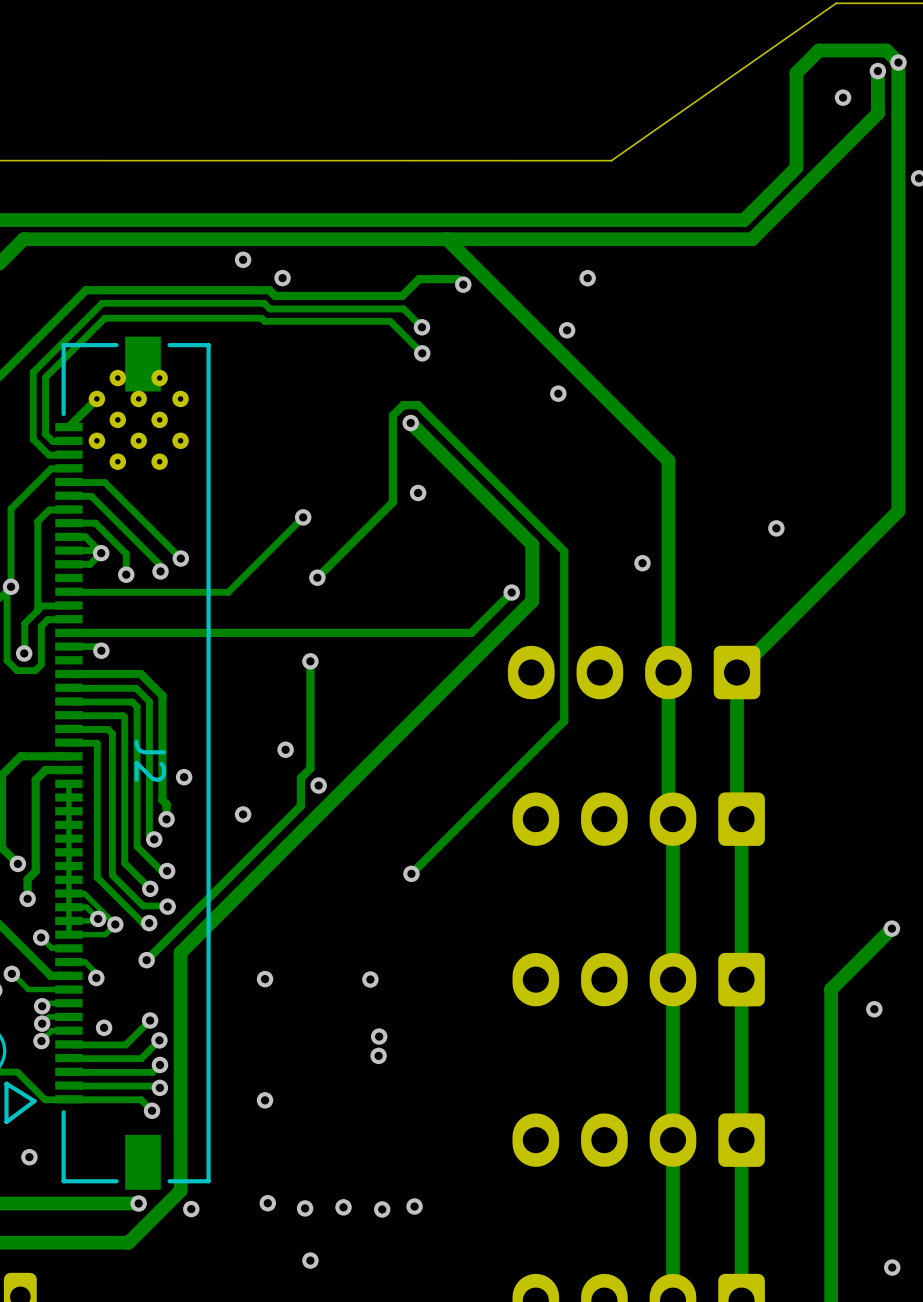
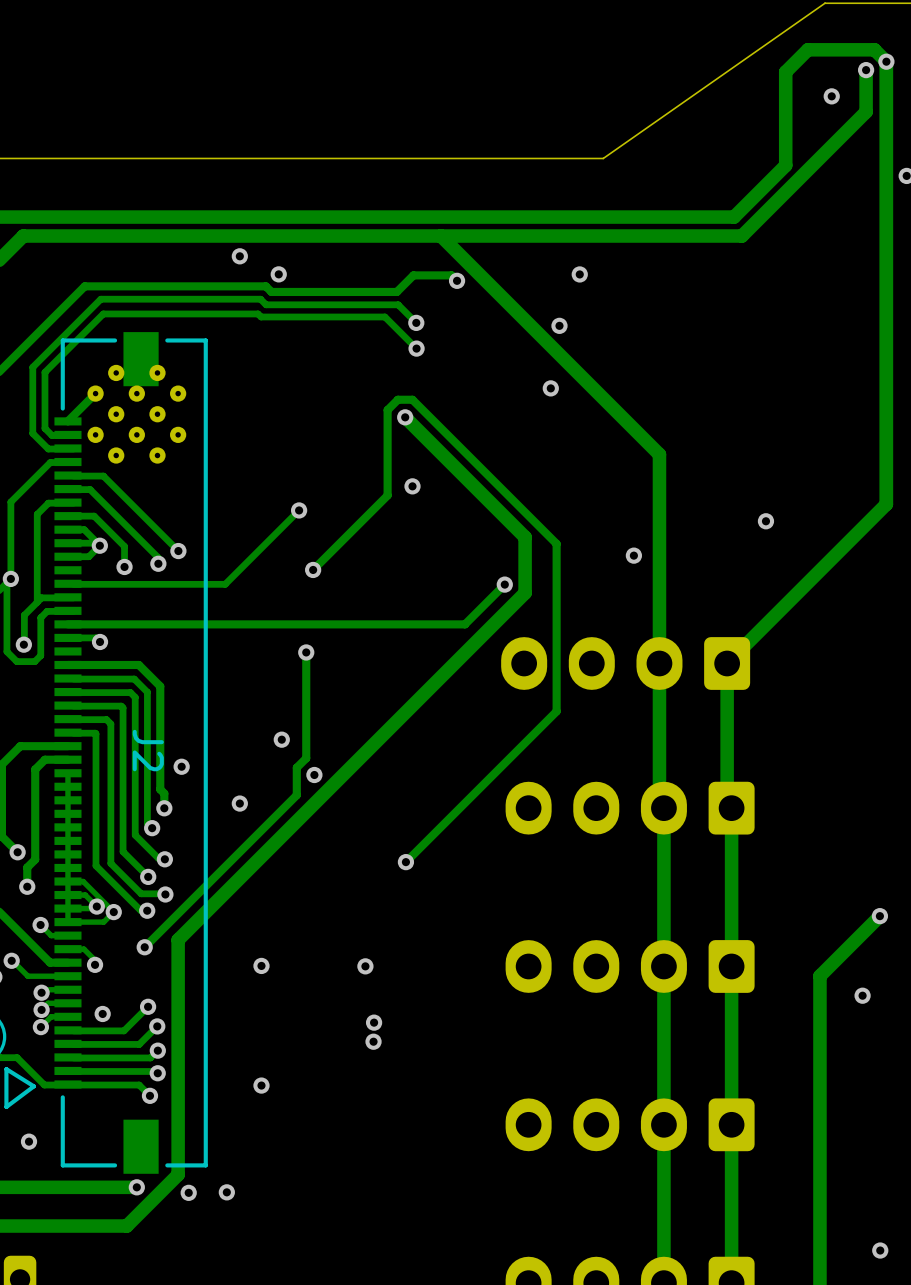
via: (267, 1203) -> none
via: (414, 1206) -> none
via: (343, 1207) -> none
via: none -> (226, 1192)
via: (305, 1208) -> none
via: (382, 1209) -> none
via: (310, 1260) -> none

